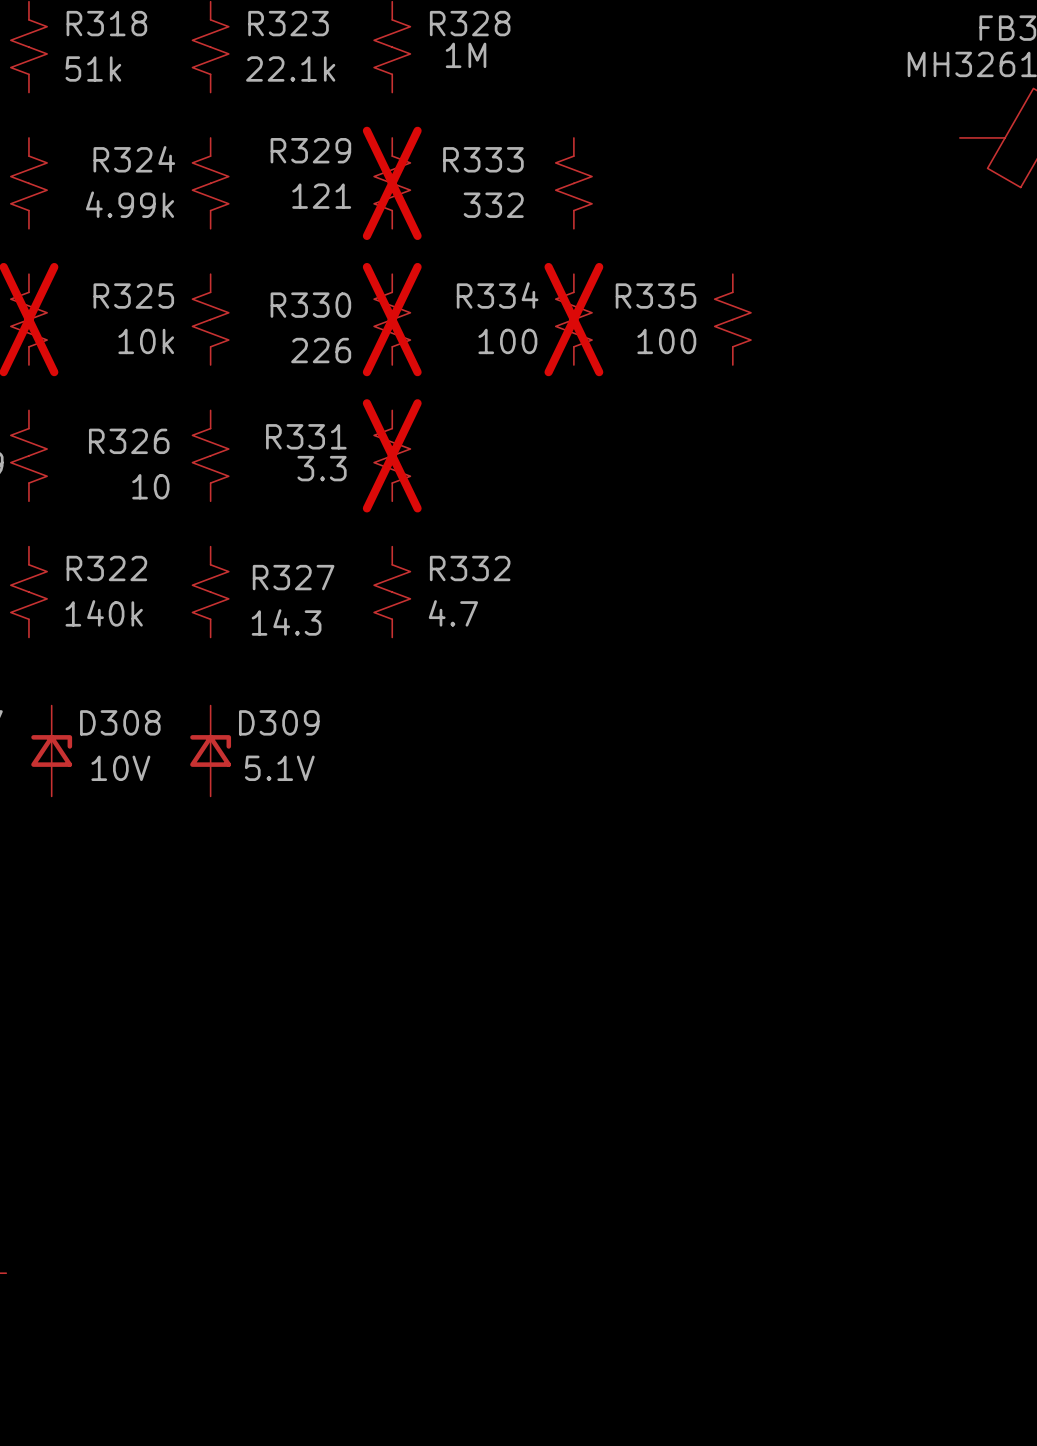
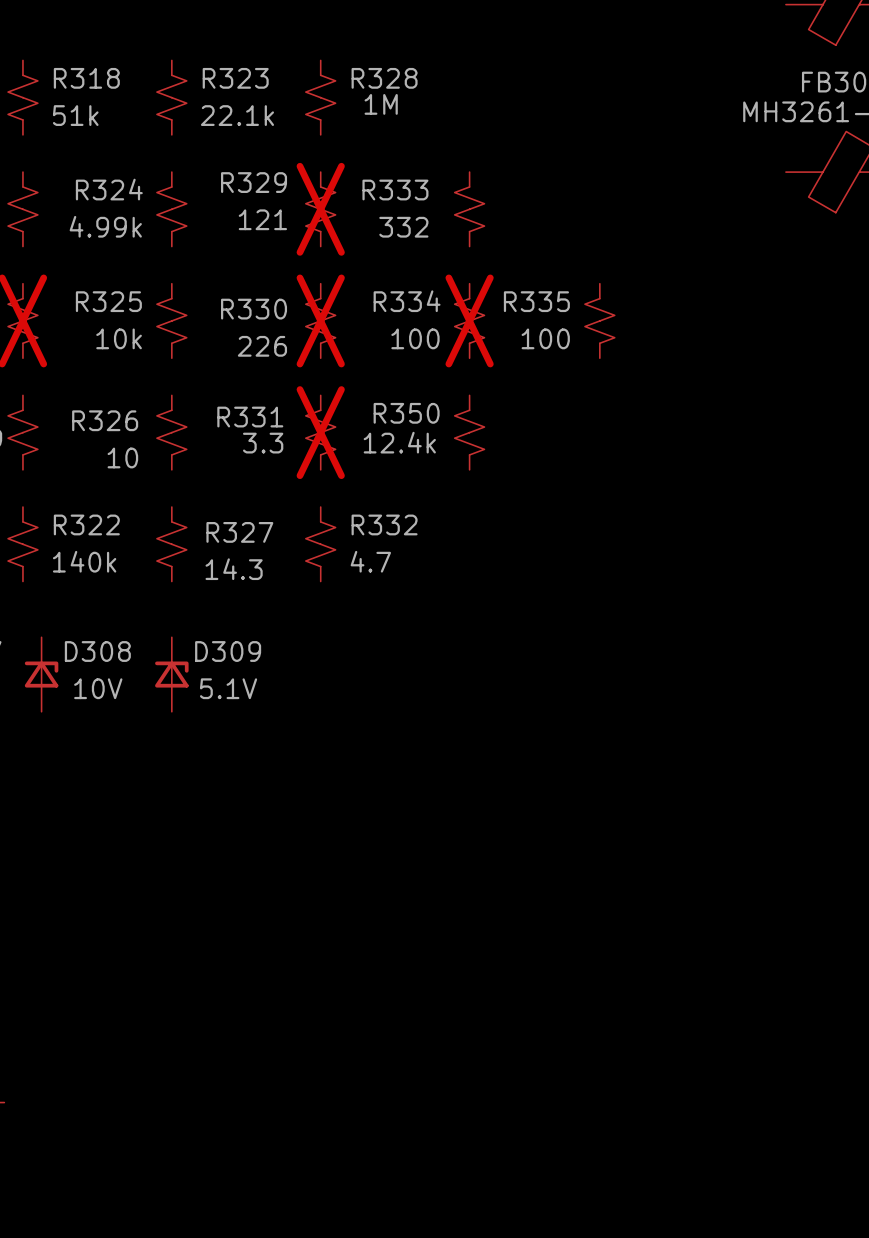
R350: none -> 12.4k (469, 432)

